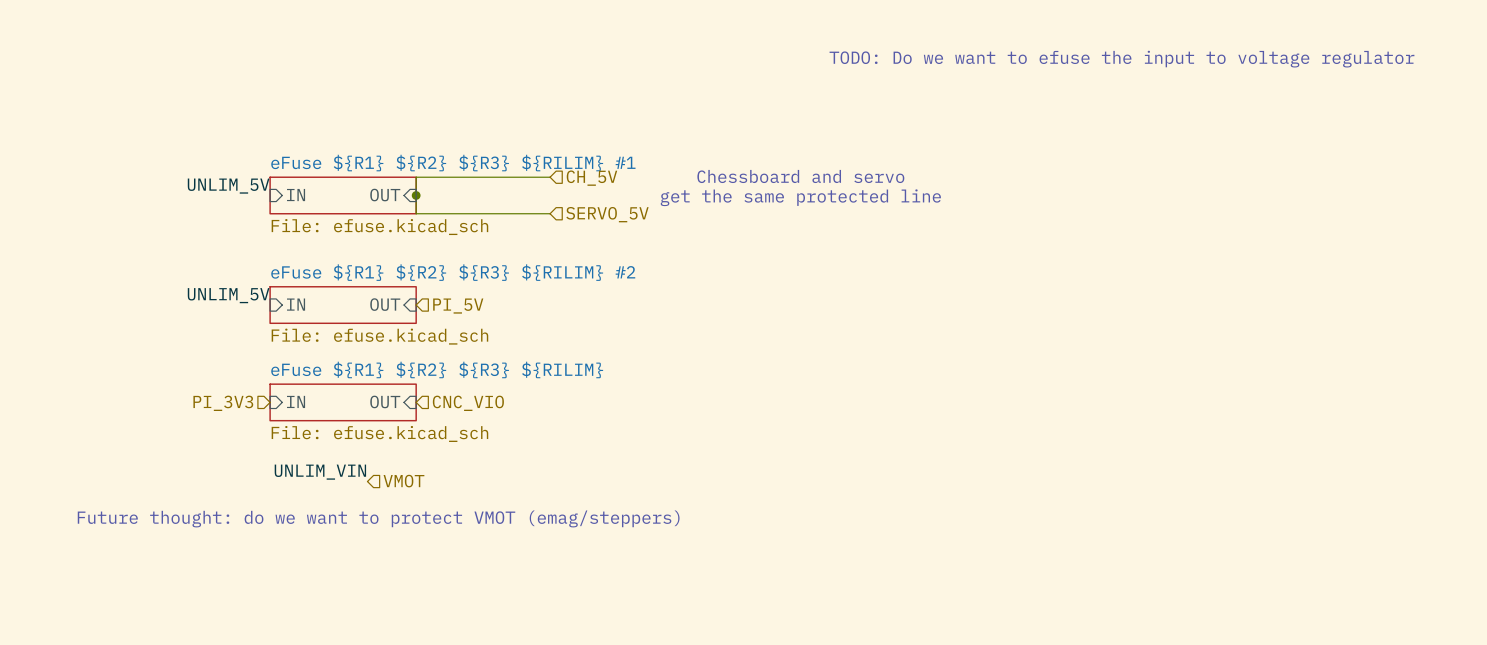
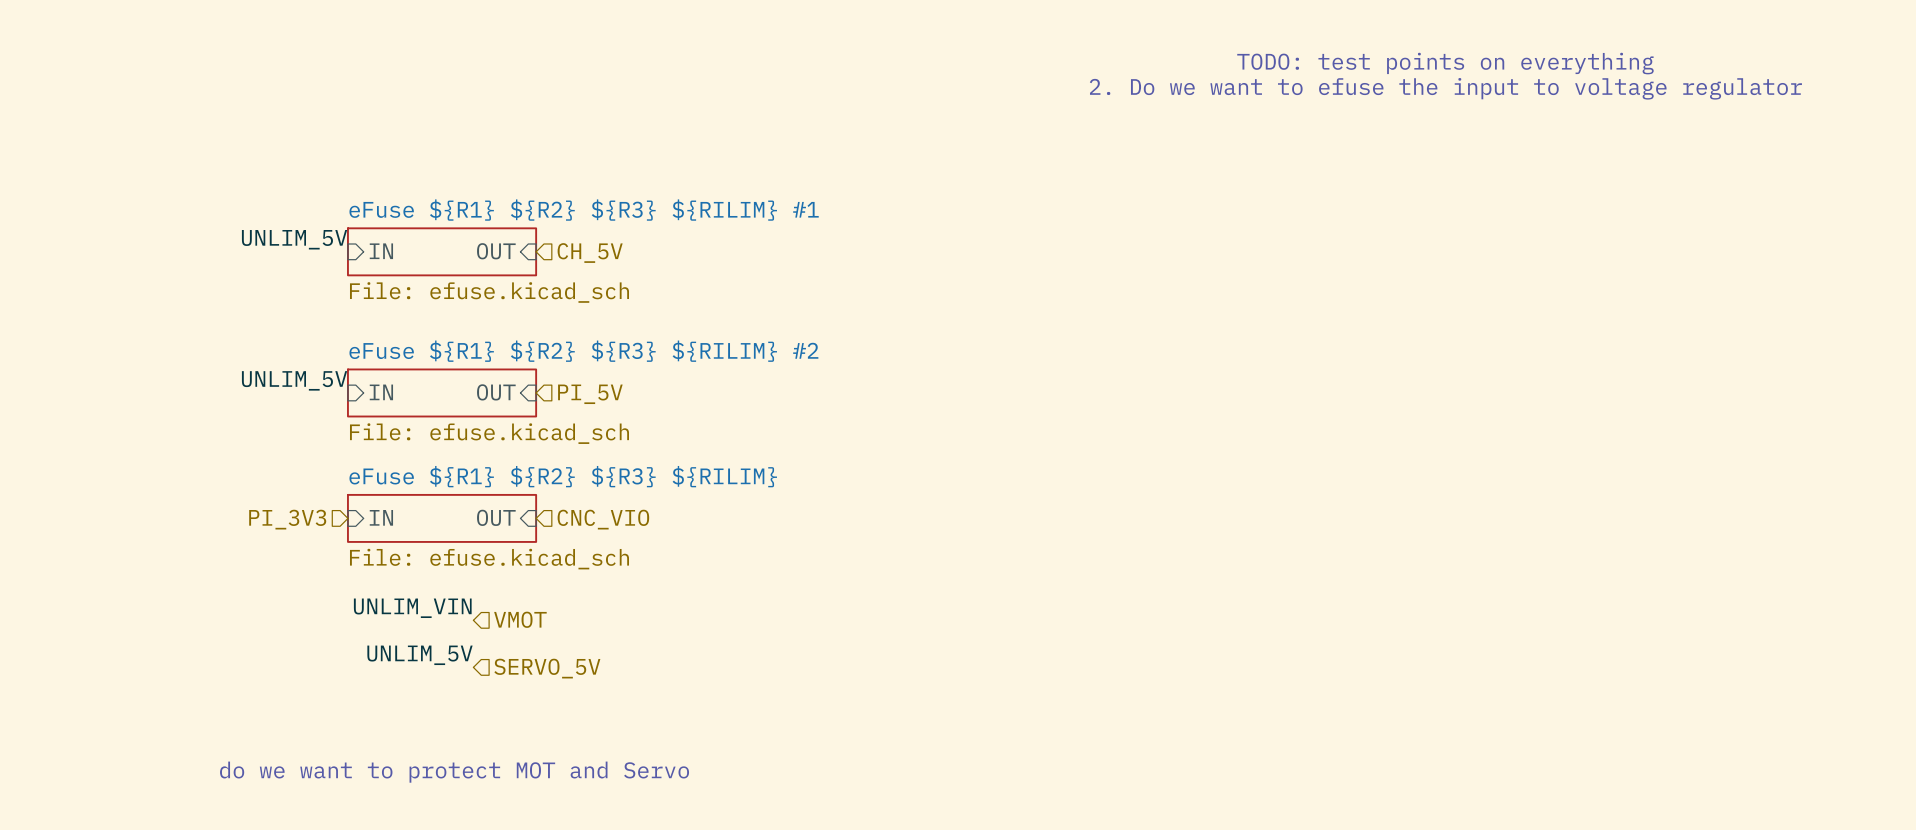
text: none -> TODO: test points on everything (1445, 63)
text: TODO: Do we want to efuse the input to voltage regulator (1121, 59) -> 2. Do we want to efuse the input to voltage regulator (1445, 88)
text: Chessboard and servo (800, 176) -> none
wire: (550, 177) (416, 177) (416, 213) (550, 213) -> none
hierarchical label position: CH_5V (591, 178) -> CH_5V (590, 253)
junction: (416, 195) -> none
text: get the same protected line (800, 197) -> none
hierarchical label: SERVO_5V (607, 214) -> none
label: none -> UNLIM_5V (419, 655)
text: Future thought: do we want to protect VMOT (emag/steppers) (378, 518) -> none
hierarchical label: none -> SERVO_5V (547, 668)
text: none -> do we want to protect MOT and Servo (454, 772)

